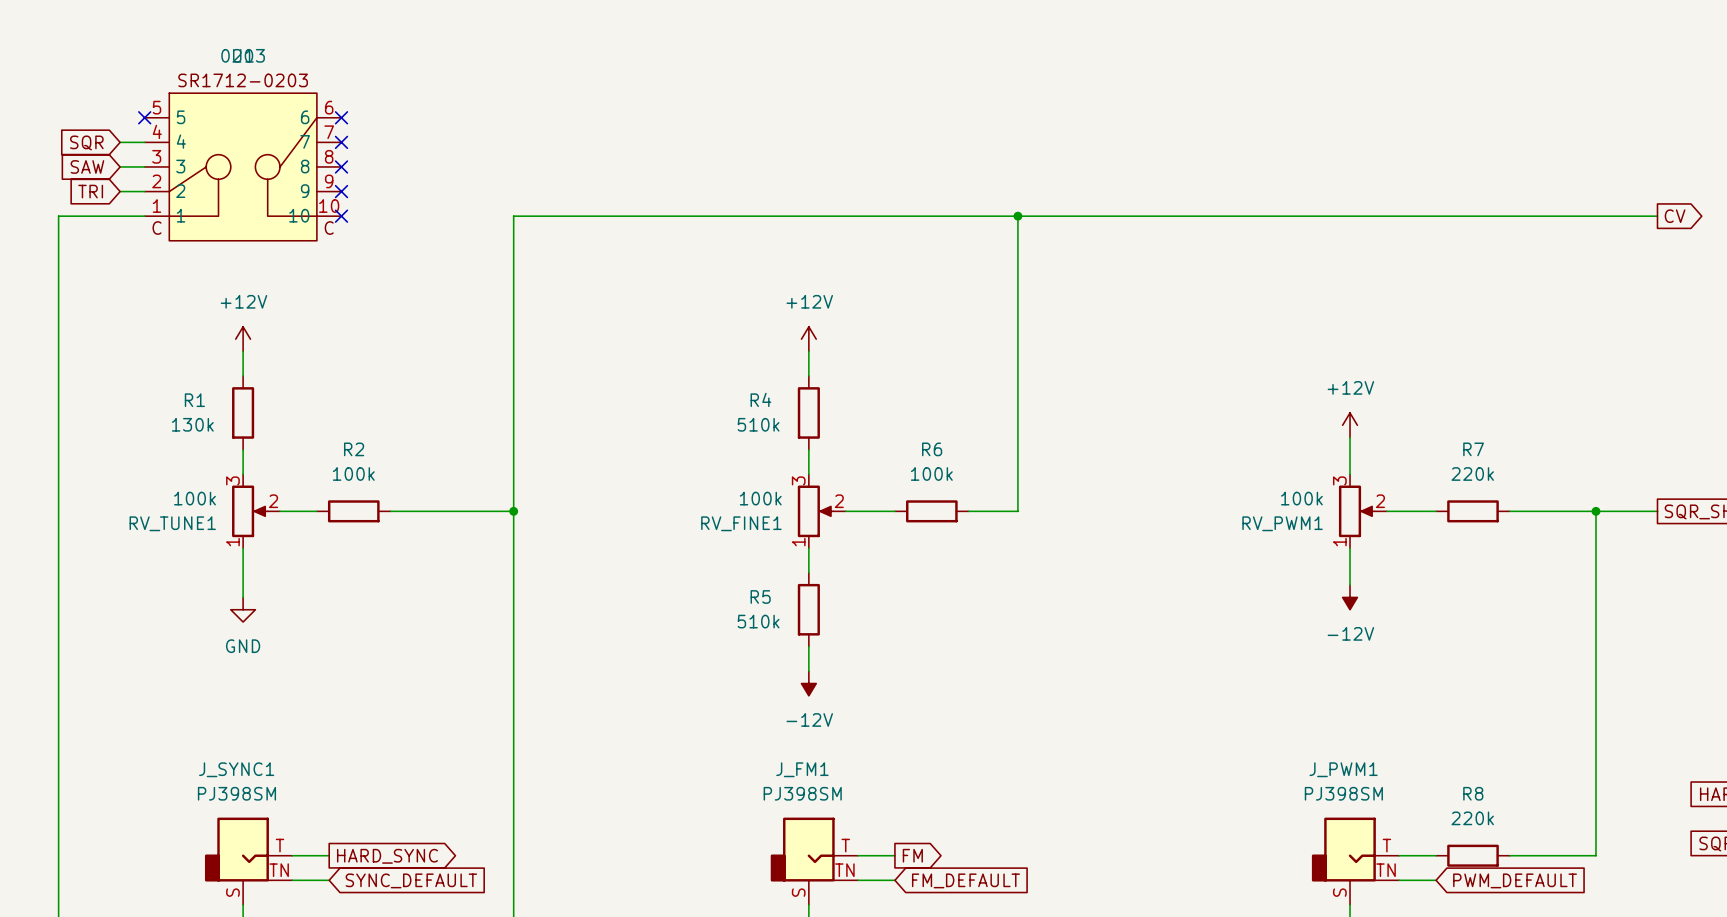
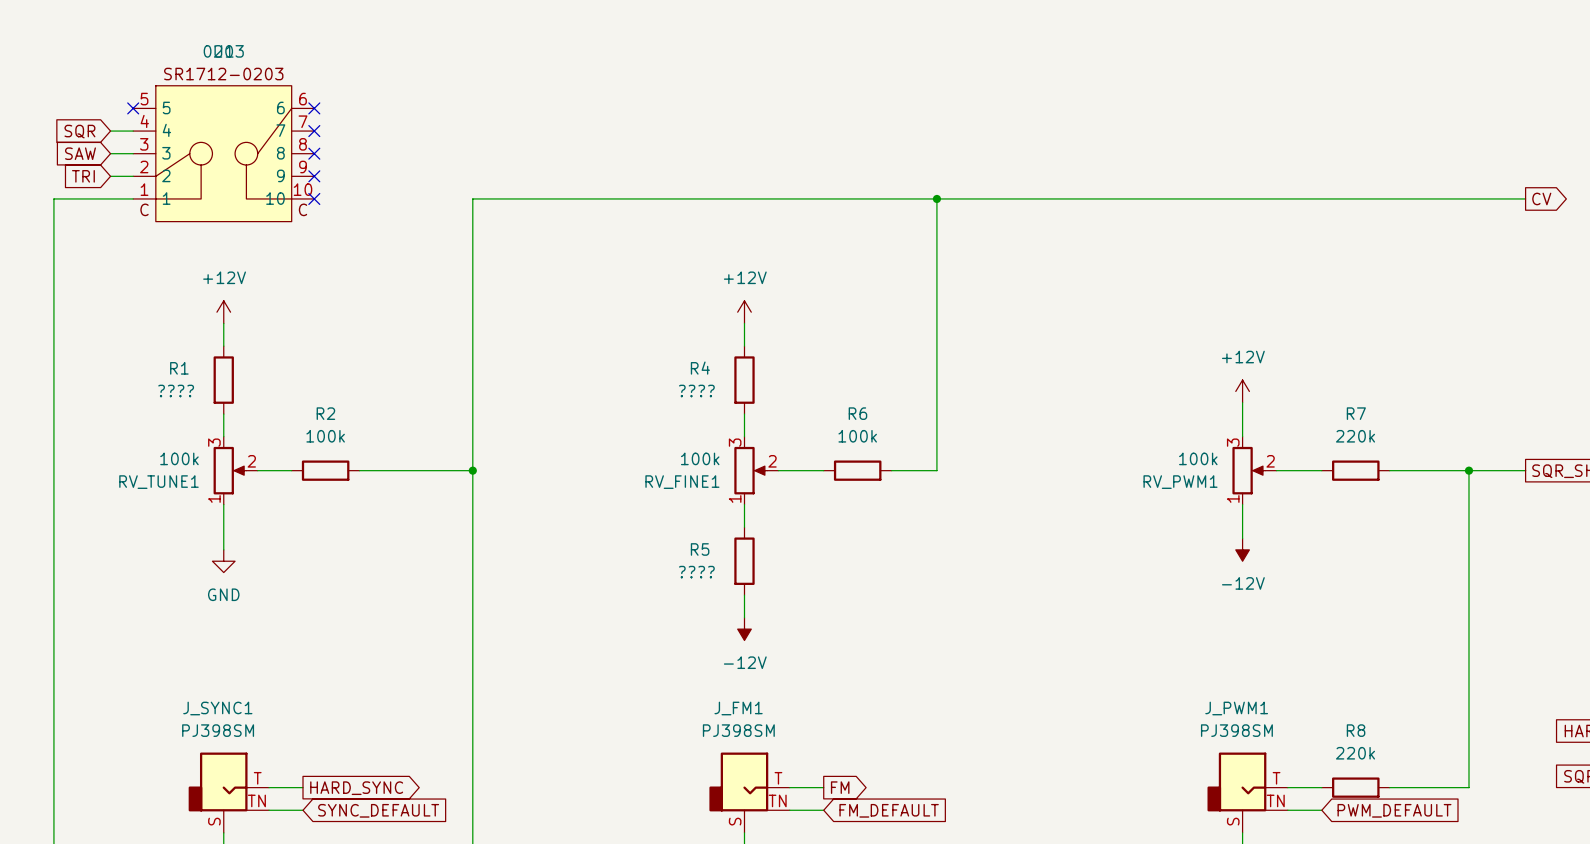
R1 value: 130k (192, 424) -> ???? (176, 390)
R4 value: 510k (758, 424) -> ???? (696, 390)
R5 value: 510k (758, 621) -> ???? (696, 572)

